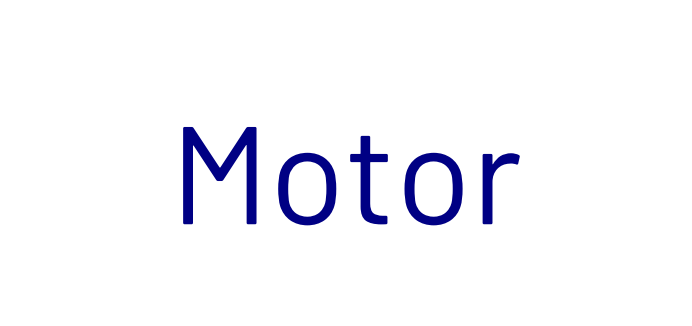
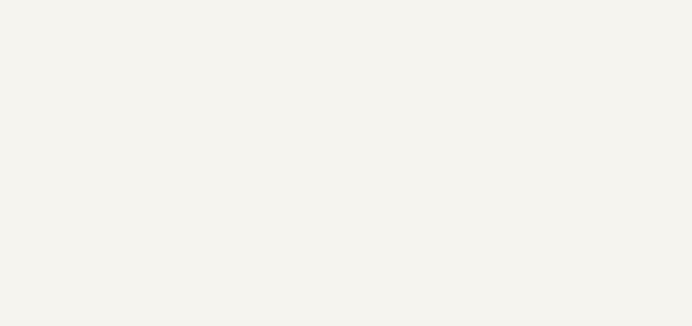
text: Motor (351, 176) -> none

